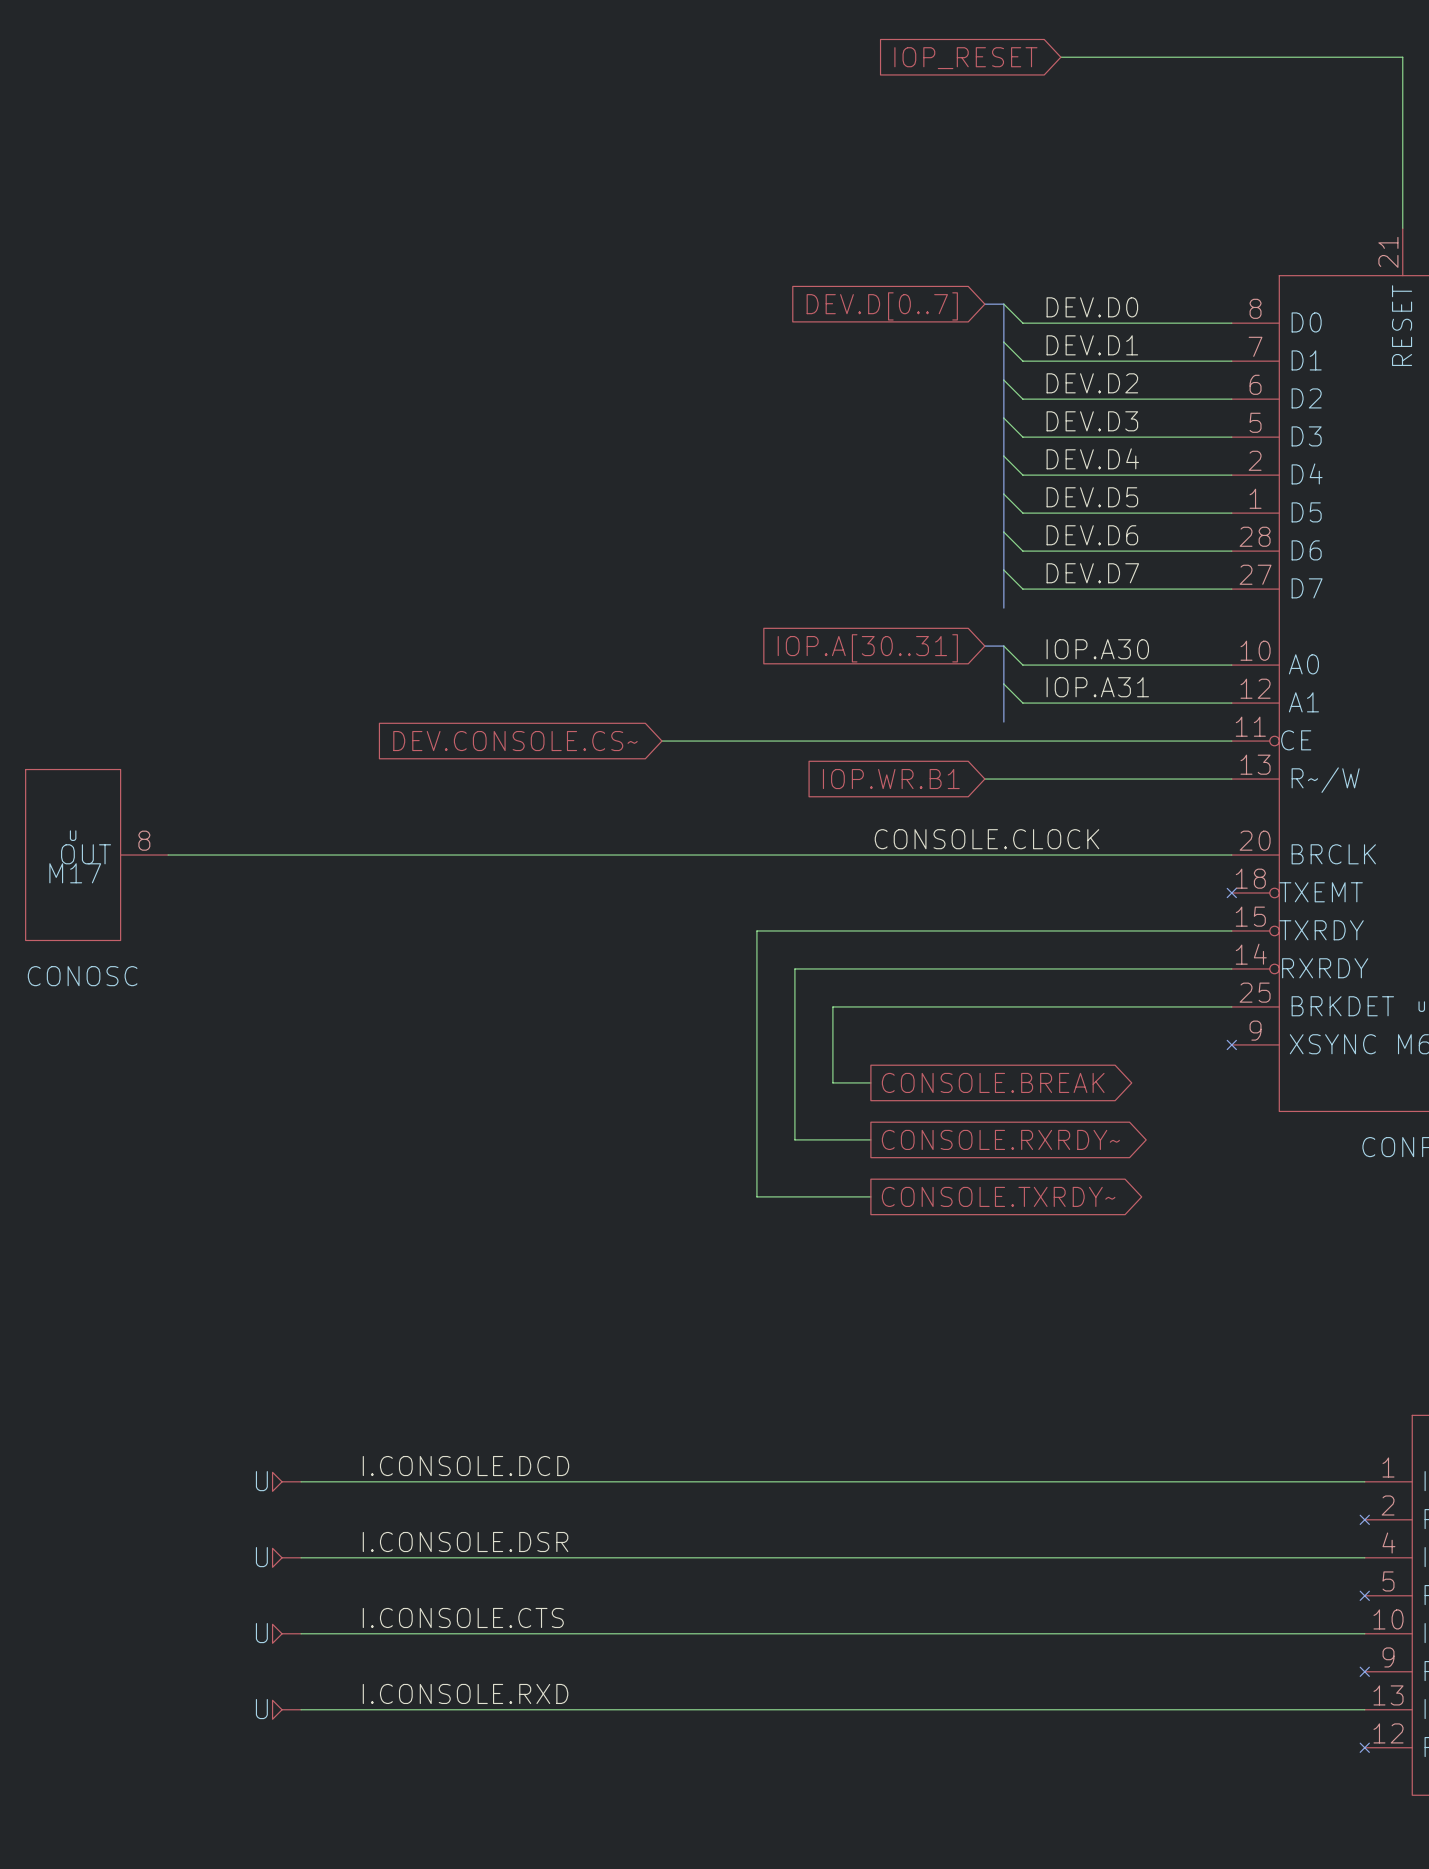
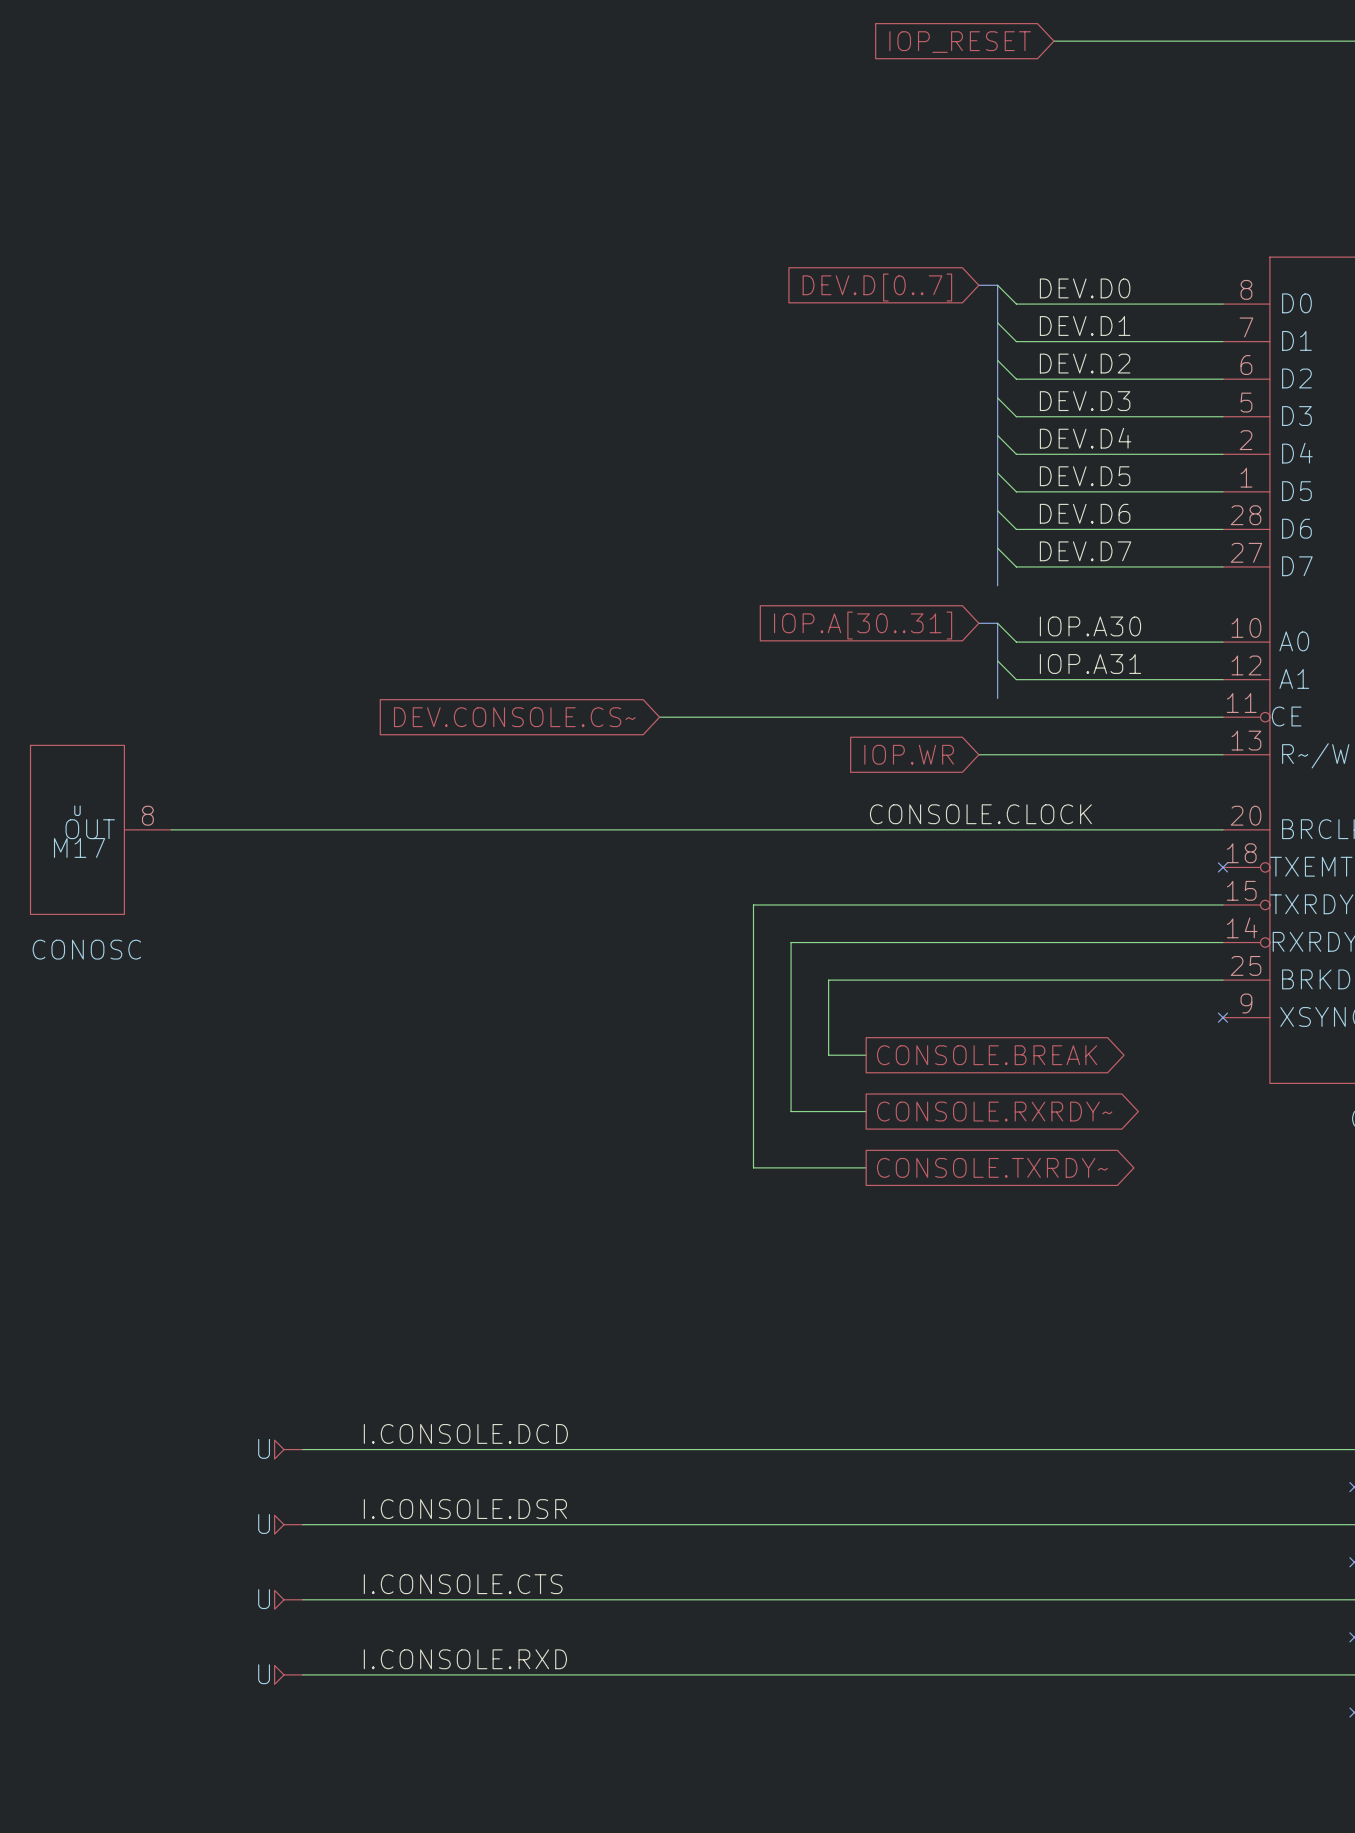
global label: IOP.WR.B1 (891, 779) -> IOP.WR (909, 754)

